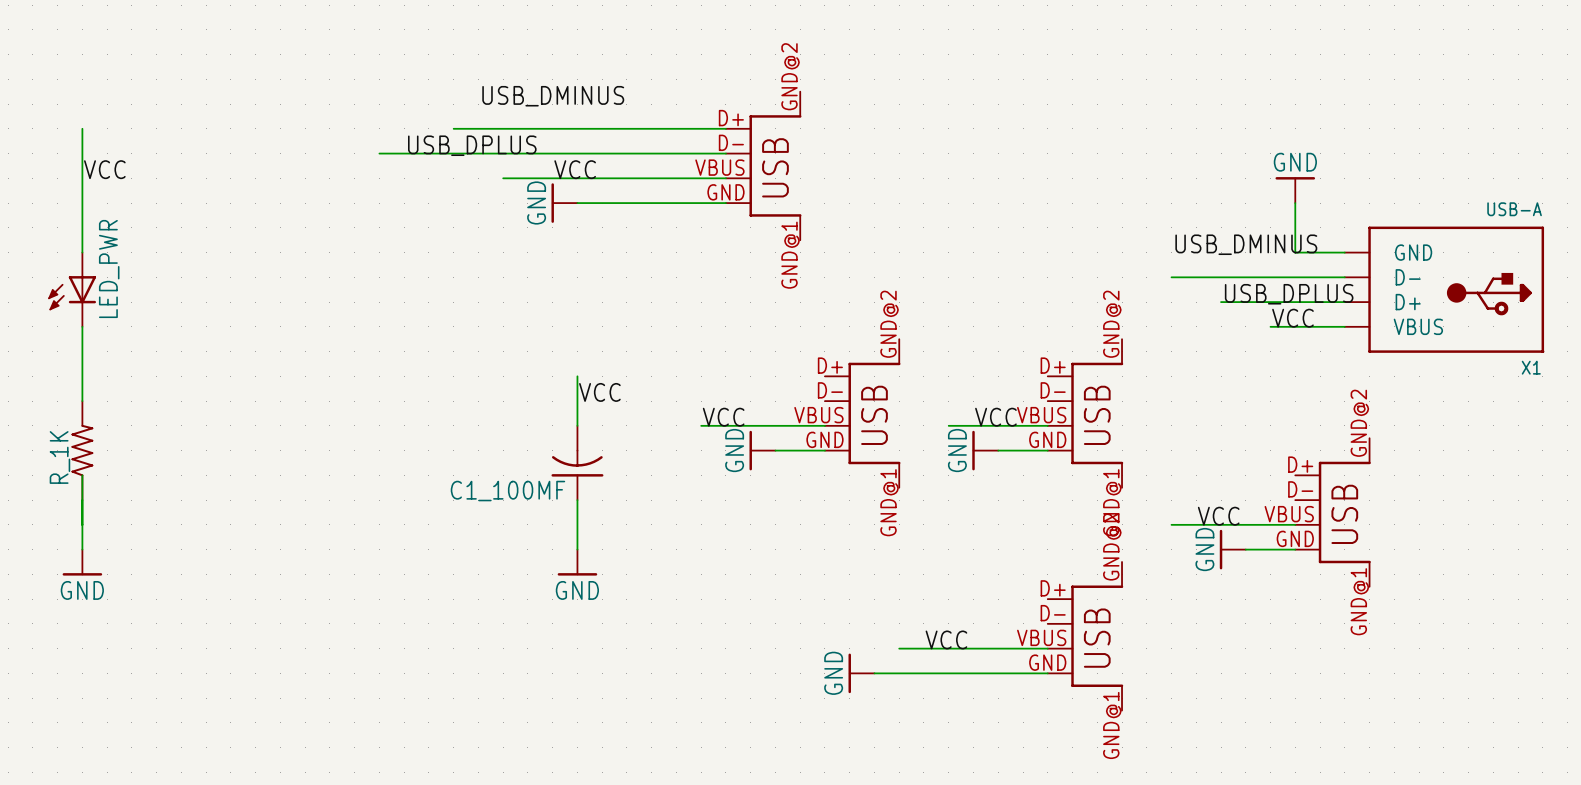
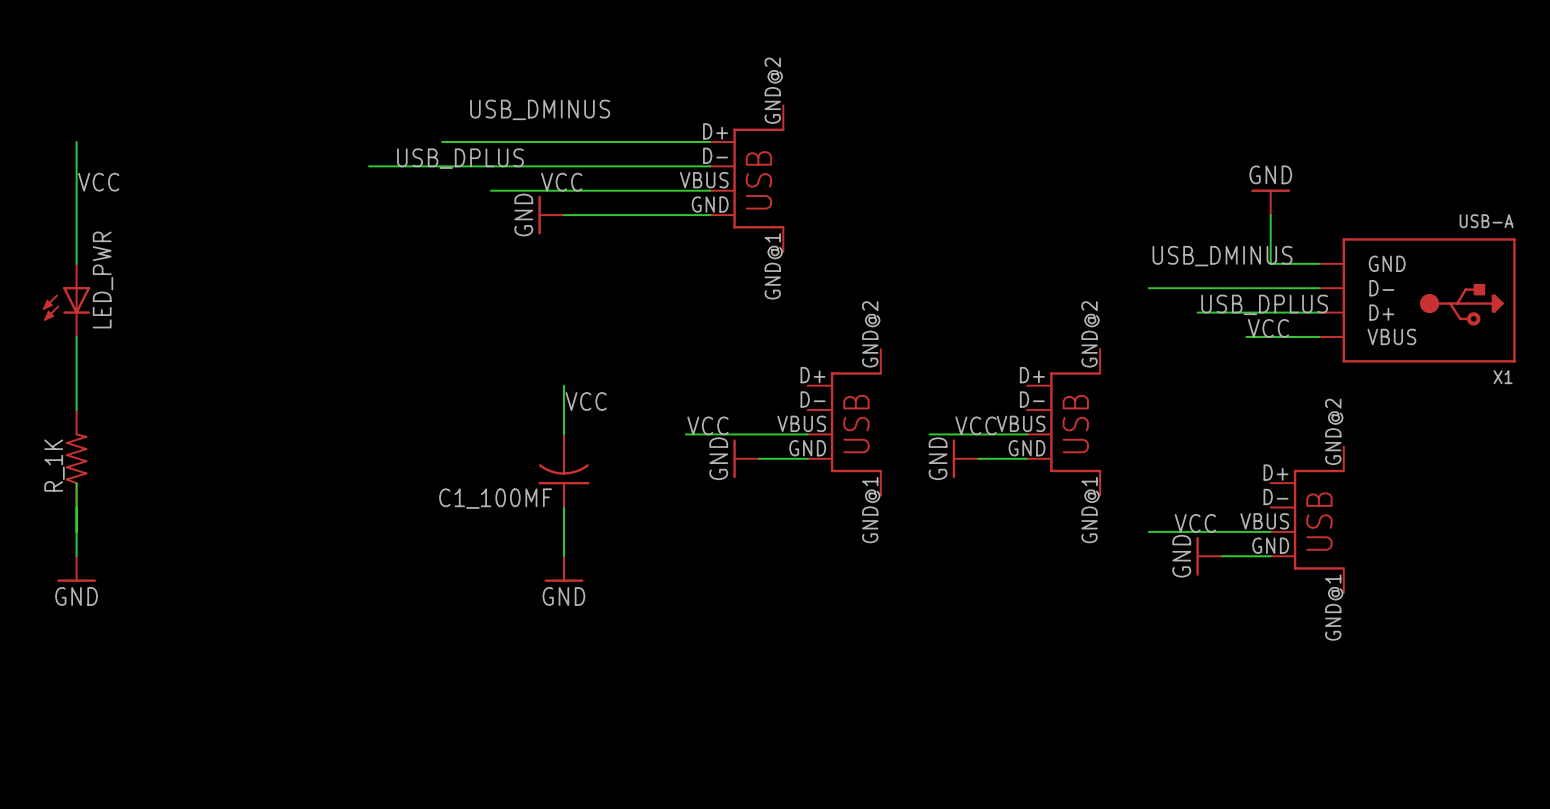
part: (1085, 636) -> none
label: VCC (946, 639) -> none
wire: (899, 648) (1047, 648) -> none
power symbol: GND (861, 673) -> none
wire: (874, 673) (1047, 673) -> none

